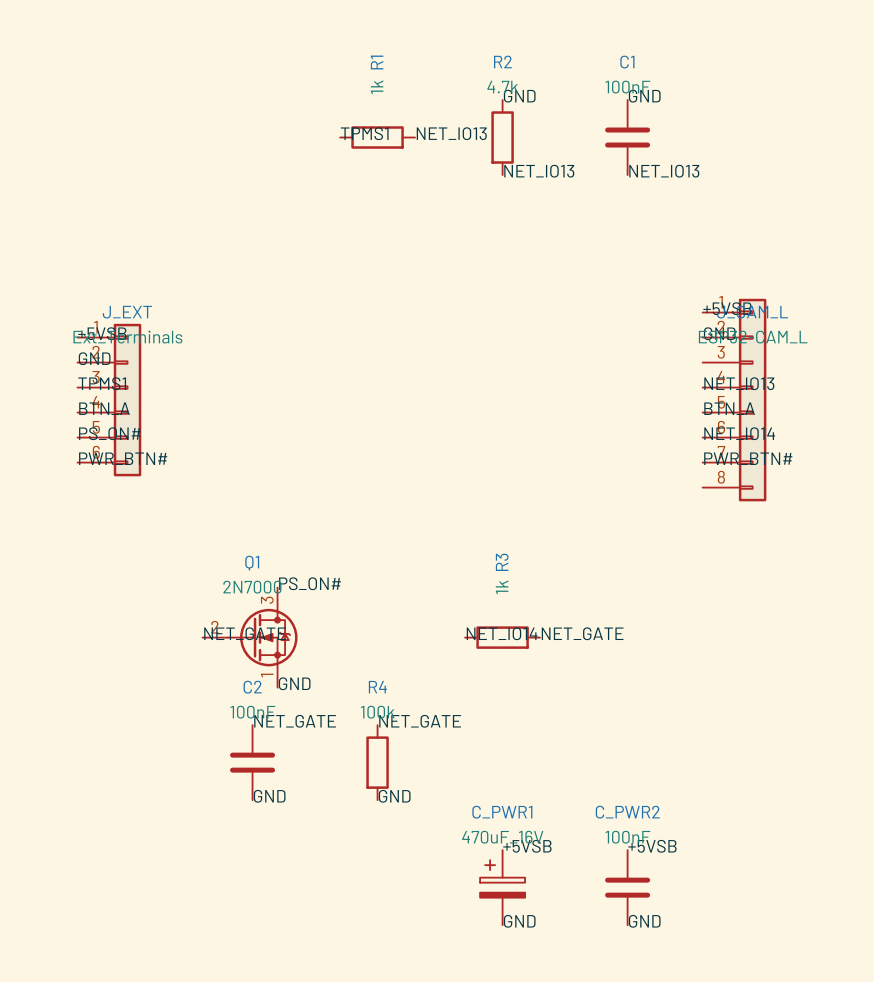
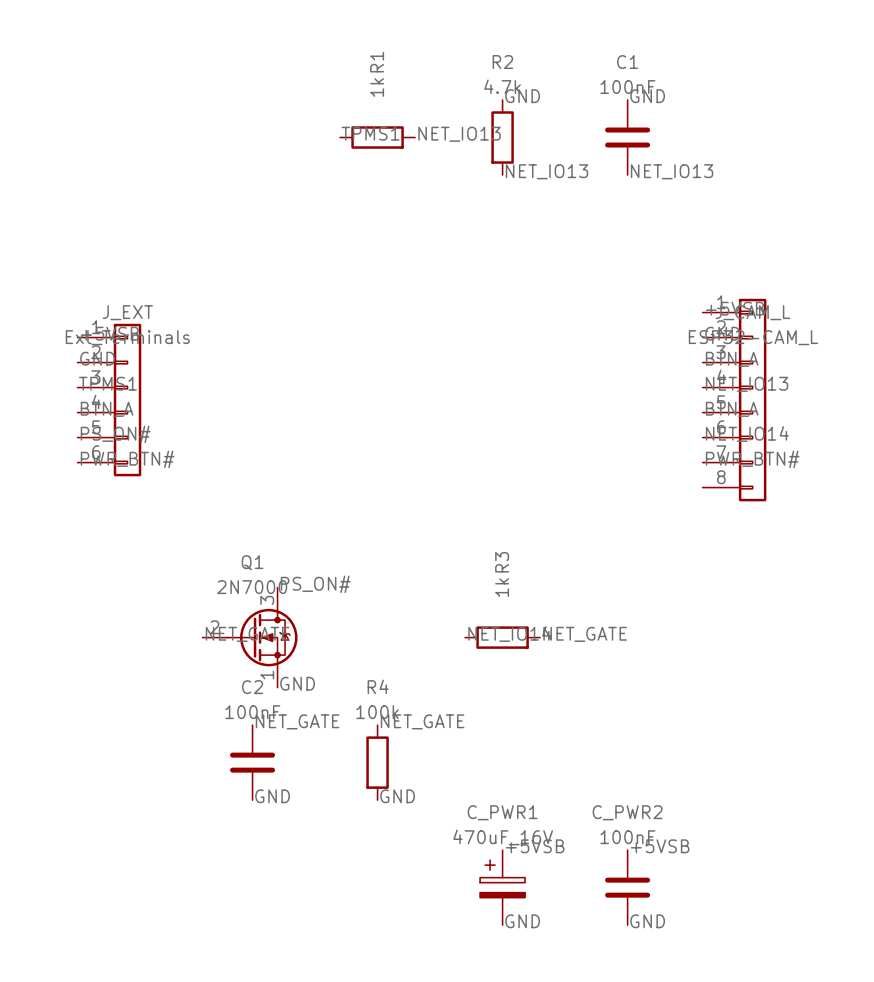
label: none -> BTN_A (732, 359)

